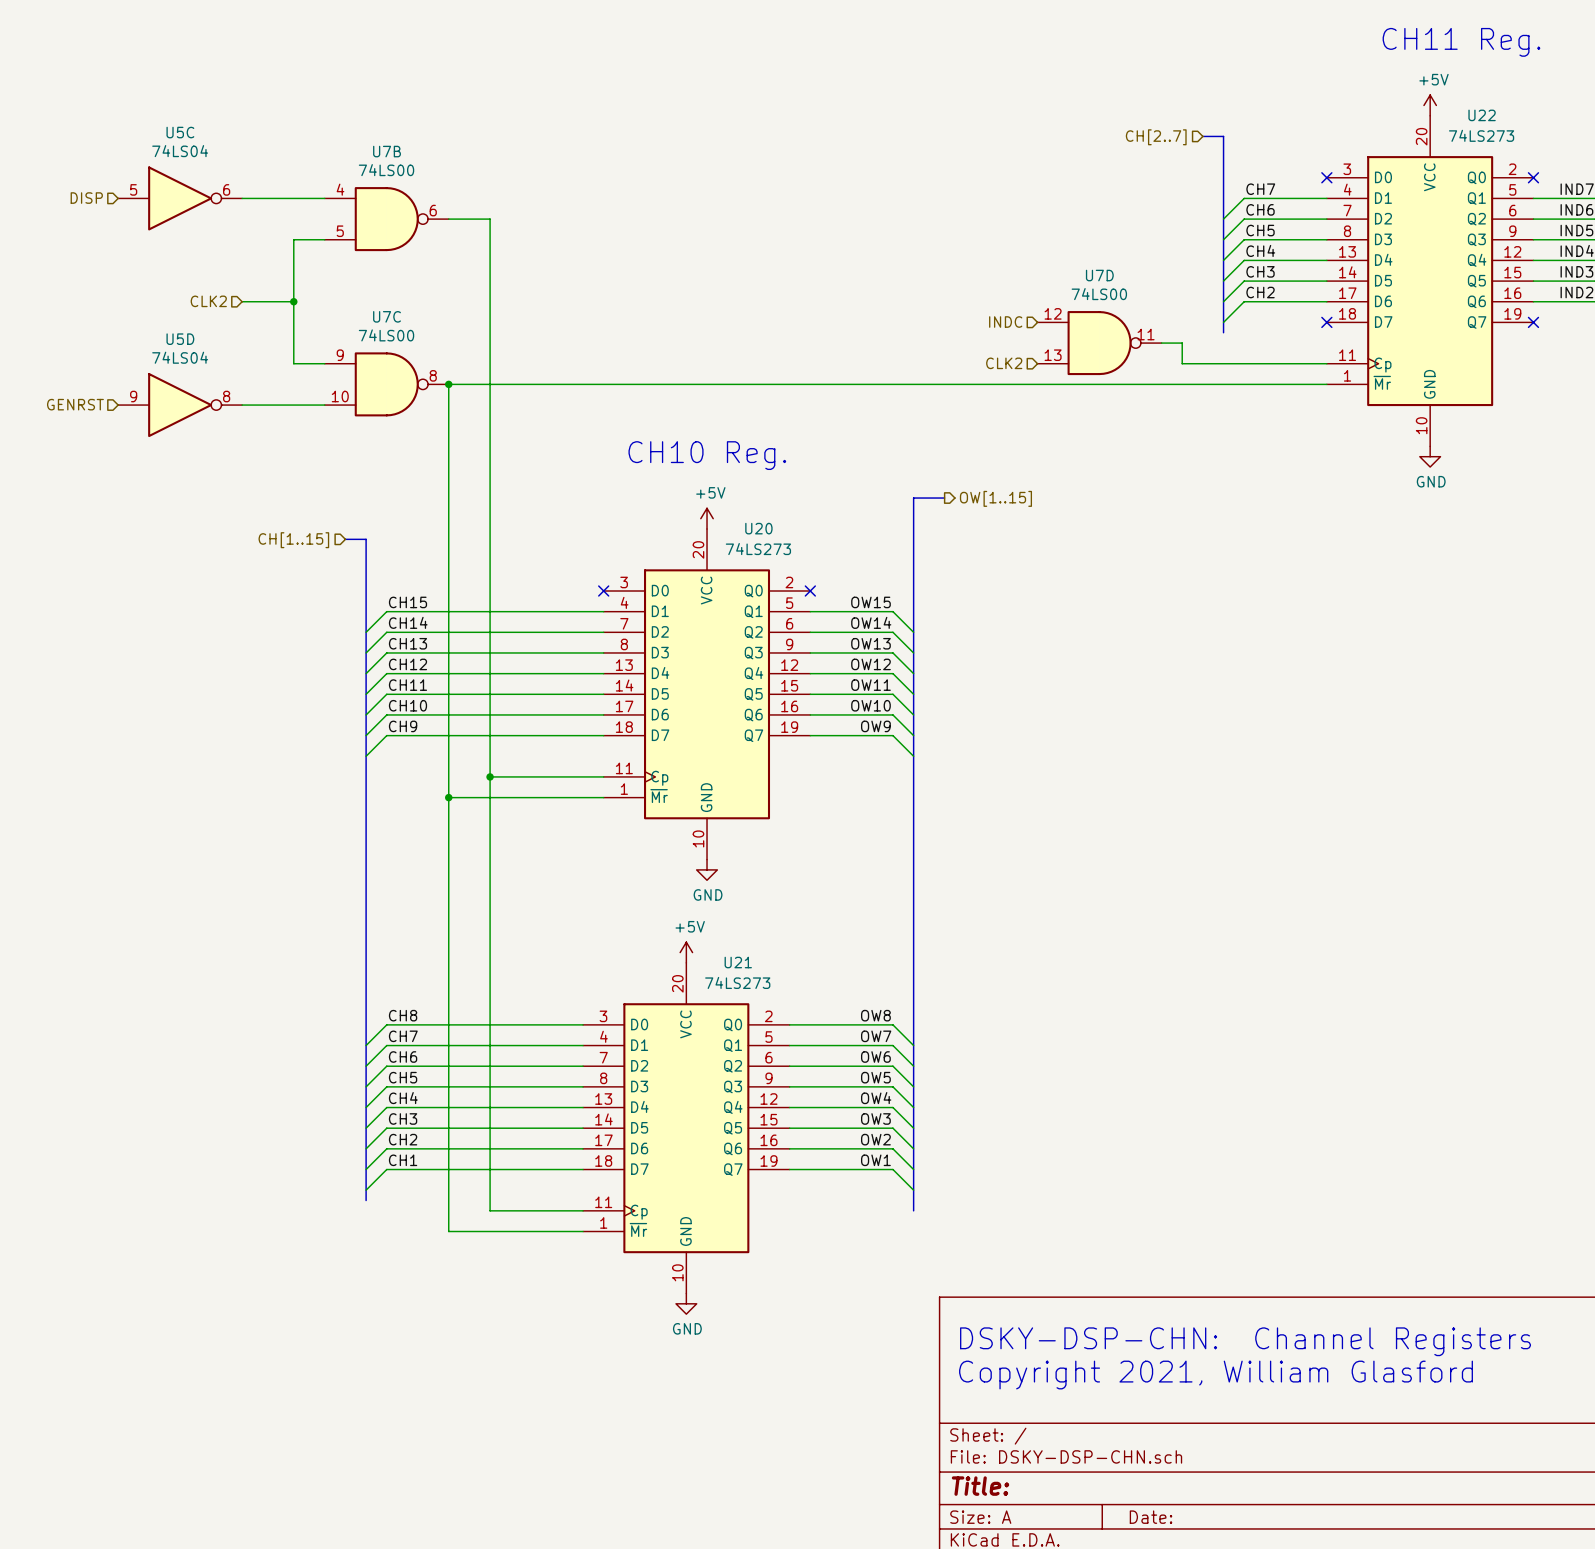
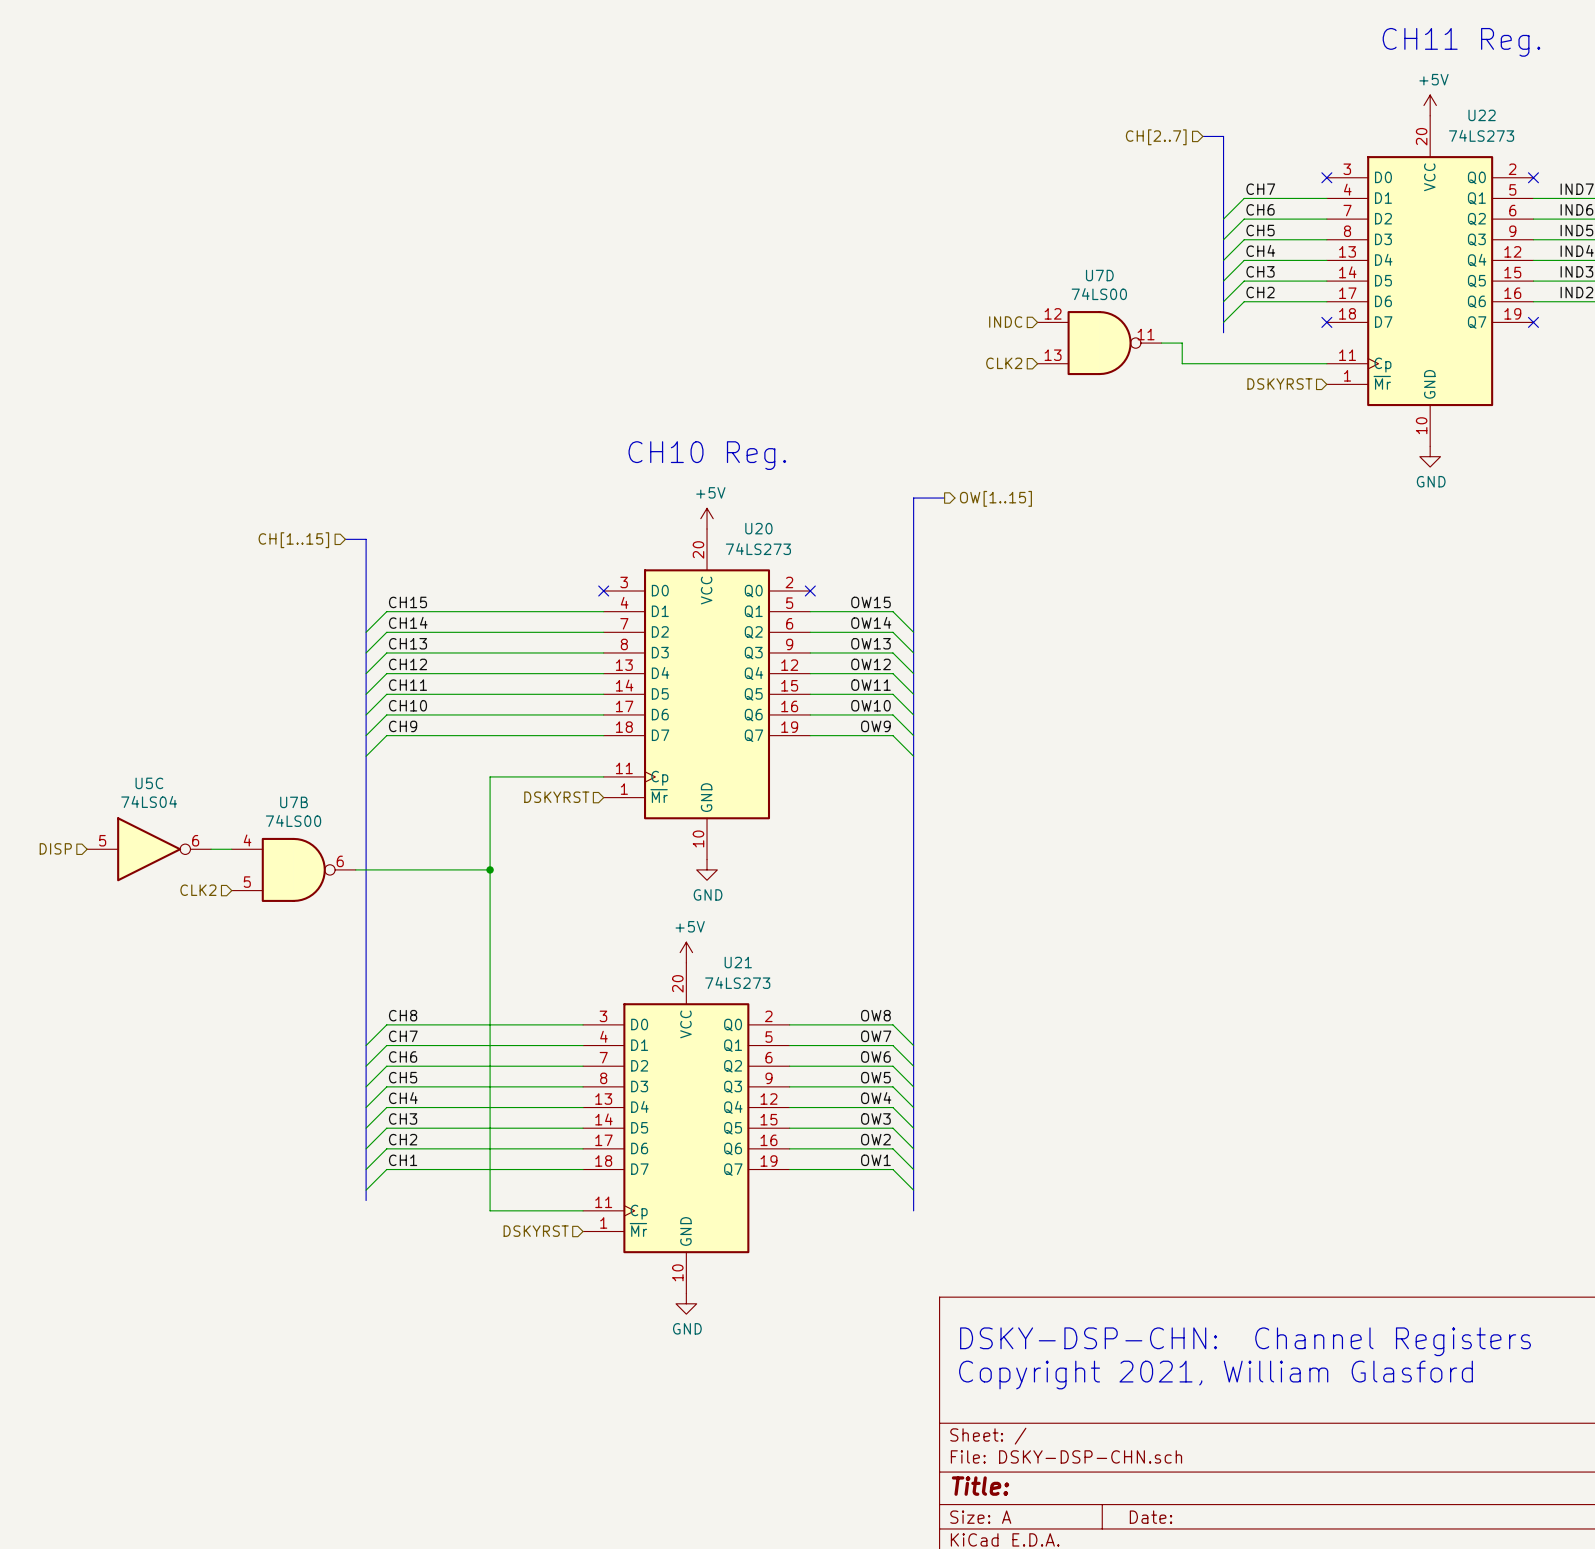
hierarchical label: DISP (86, 198) -> none
U5C position: (180, 198) -> (149, 849)
wire: (242, 198) (324, 198) -> none
U7B position: (386, 219) -> (293, 869)
wire: (448, 219) (490, 219) (490, 776) -> none
wire: (324, 239) (293, 239) (293, 363) (324, 363) -> none
hierarchical label: CLK2 (208, 301) -> none
wire: (242, 301) (293, 301) -> none
junction: (293, 301) -> none
U7C: 74LS00 (386, 384) -> none
junction: (448, 384) -> none
hierarchical label: none -> DSKYRST (1279, 384)
wire: (1326, 384) (448, 384) (448, 1231) (583, 1231) -> none
hierarchical label: GENRST (75, 404) -> none
U5D: 74LS04 (180, 405) -> none
wire: (242, 405) (324, 405) -> none
junction: (490, 776) -> none
wire: (448, 797) (603, 797) -> none
junction: (448, 797) -> none
hierarchical label: none -> DSKYRST (556, 797)
hierarchical label: none -> DISP (55, 848)
wire: none -> (211, 849) (231, 849)
wire: none -> (355, 869) (490, 869)
junction: none -> (490, 869)
hierarchical label: none -> CLK2 (198, 890)
hierarchical label: none -> DSKYRST (536, 1231)

